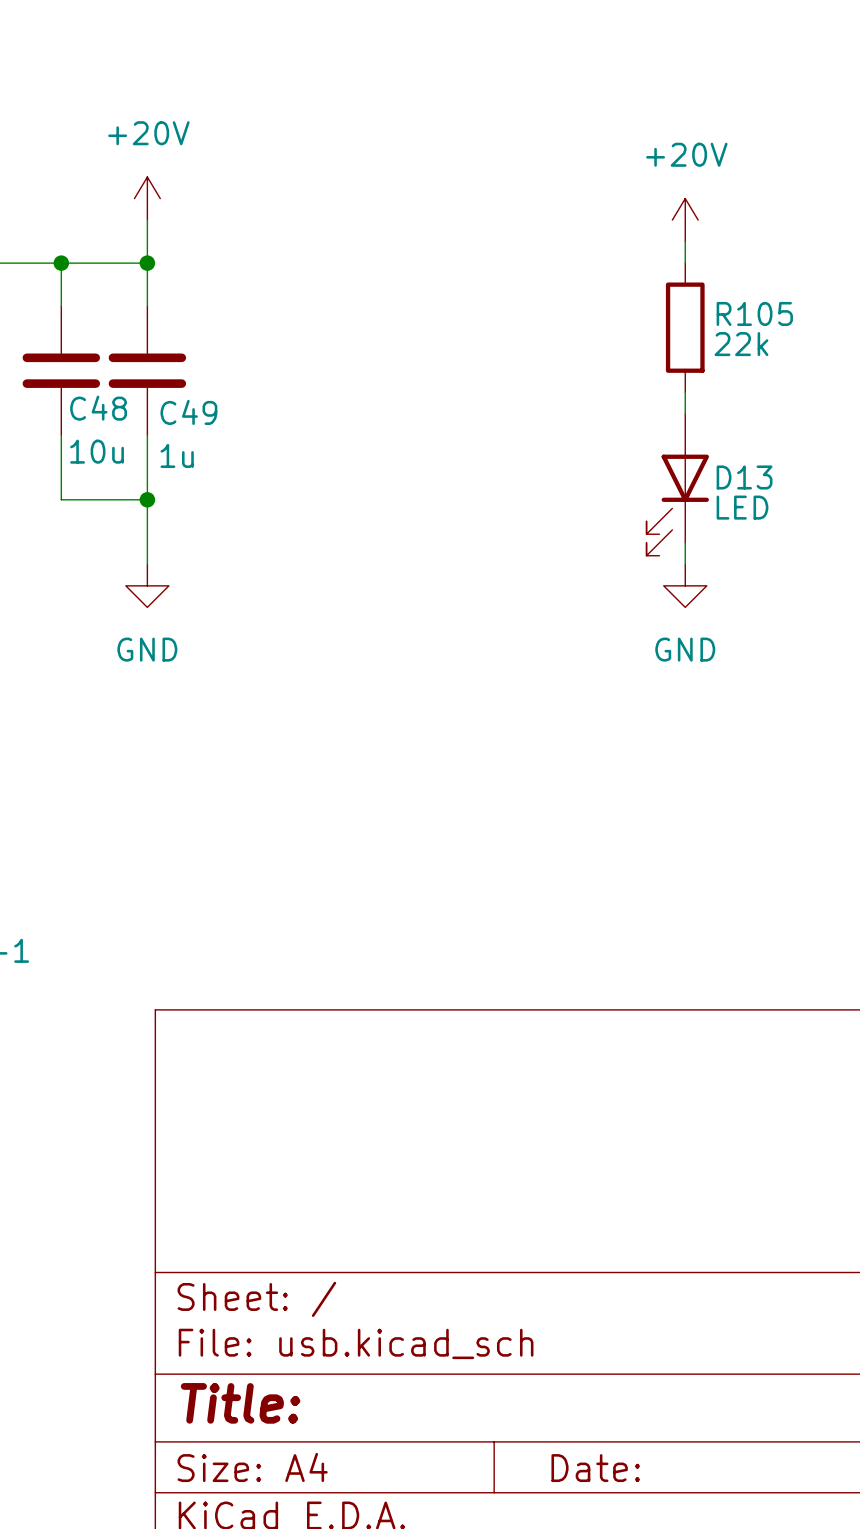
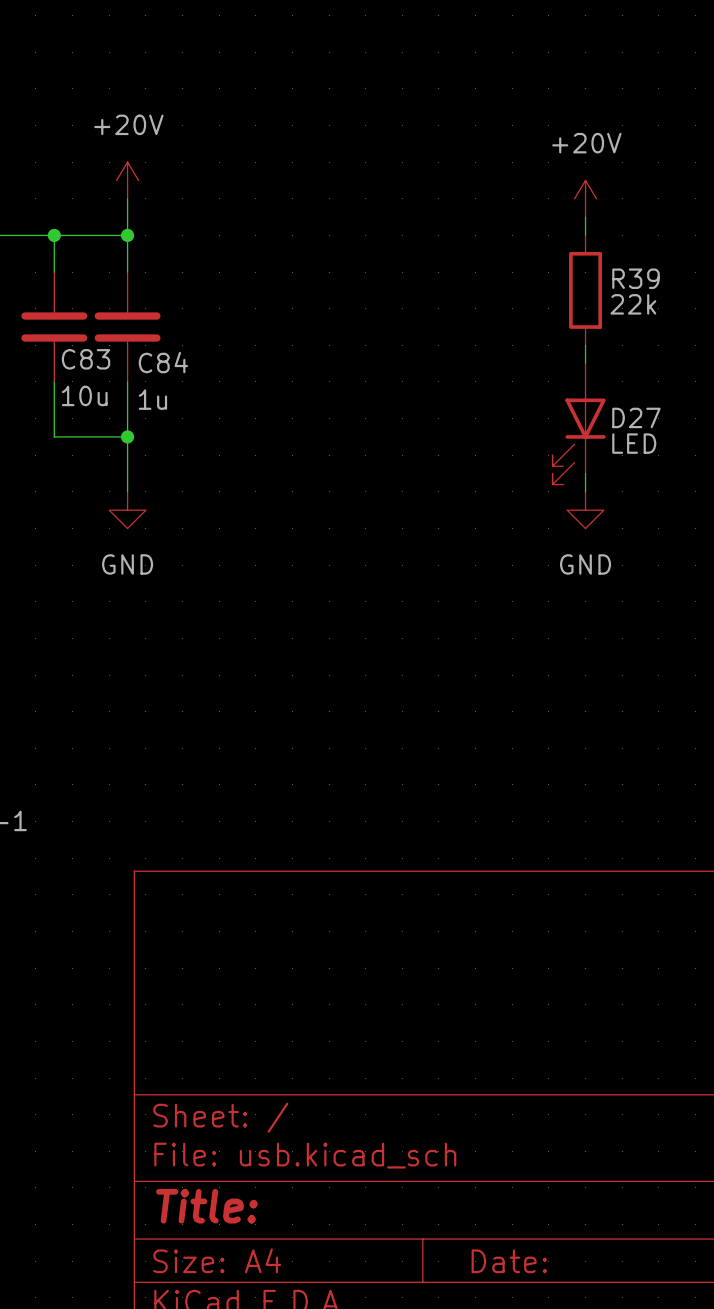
R105 name: R105 (754, 313) -> R39 (636, 278)
C48 name: C48 (98, 408) -> C83 (86, 359)
C49 name: C49 (188, 412) -> C84 (163, 362)
D13 name: D13 (744, 477) -> D27 (636, 417)

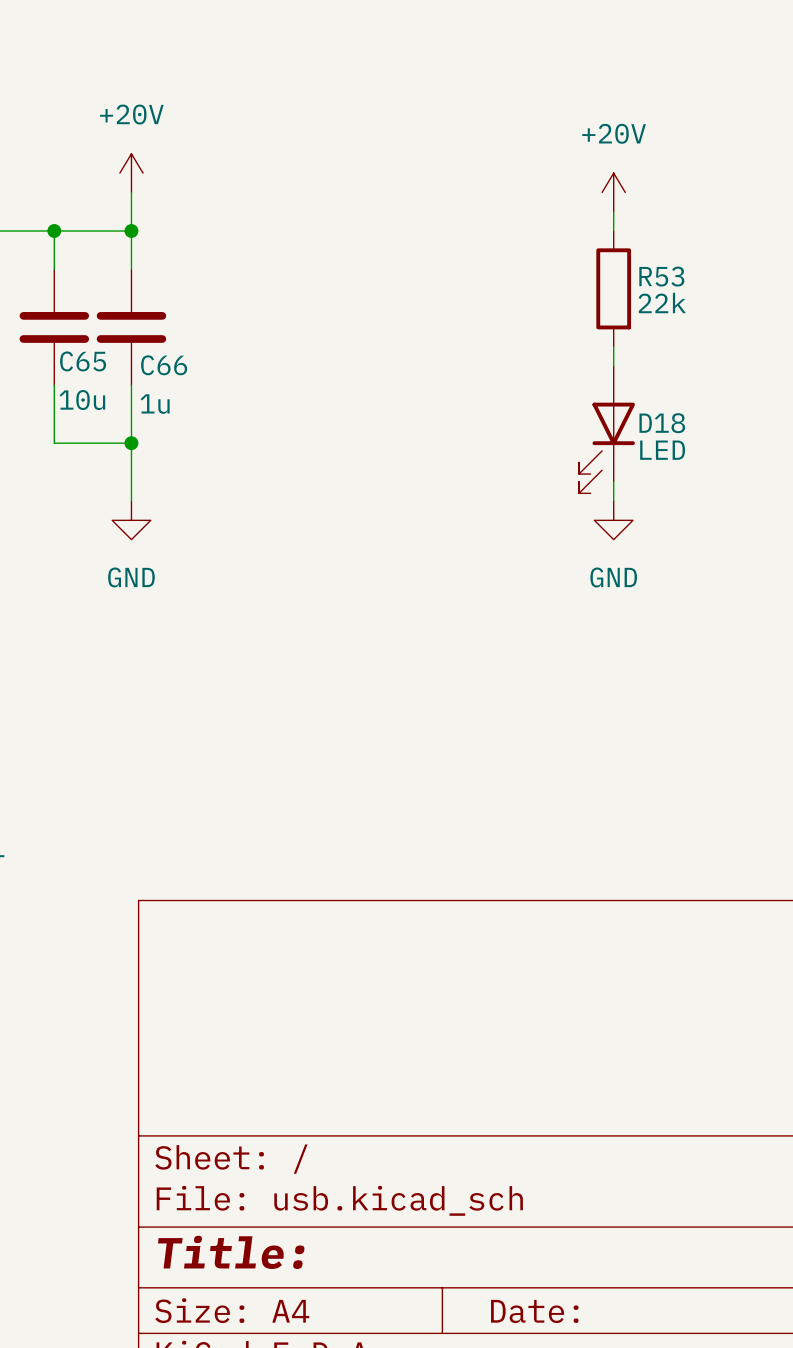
R39 name: R39 (636, 278) -> R53 (661, 276)
C83 name: C83 (86, 359) -> C65 (83, 361)
C84 name: C84 (163, 362) -> C66 (164, 365)
D27 name: D27 (636, 417) -> D18 (662, 423)

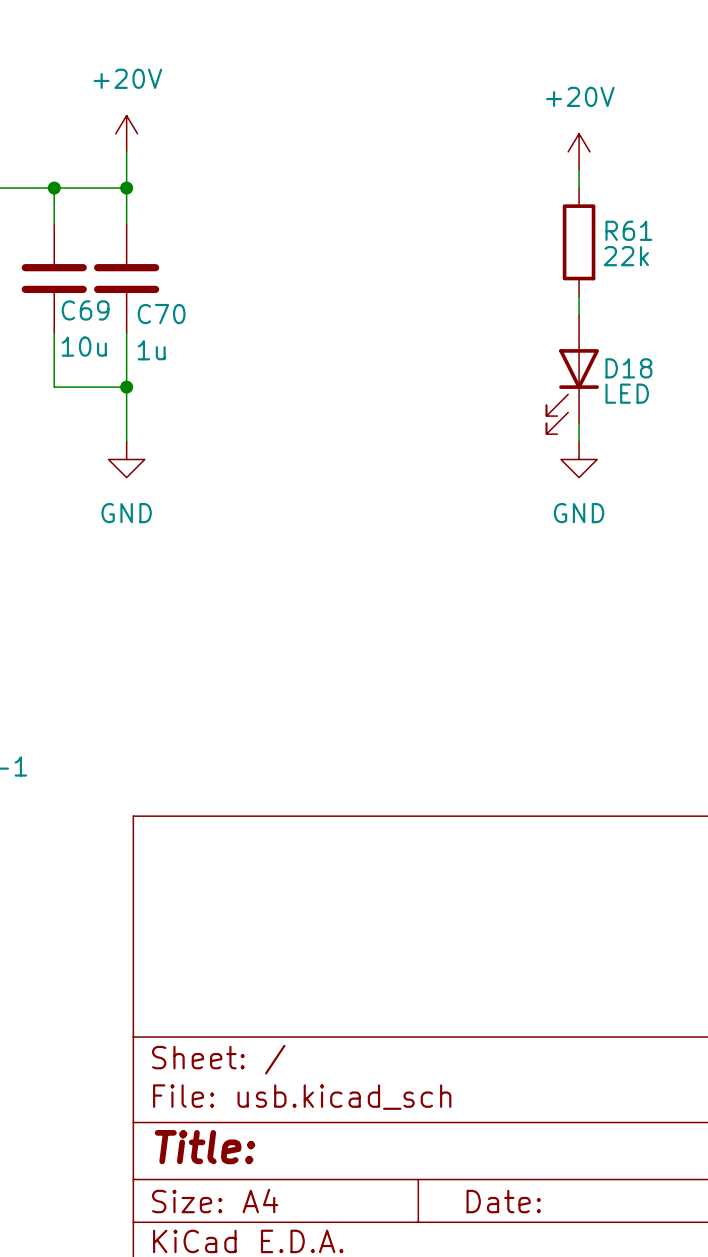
R53 name: R53 (661, 276) -> R61 (628, 230)
C65 name: C65 (83, 361) -> C69 (85, 310)
C66 name: C66 (164, 365) -> C70 (161, 314)

